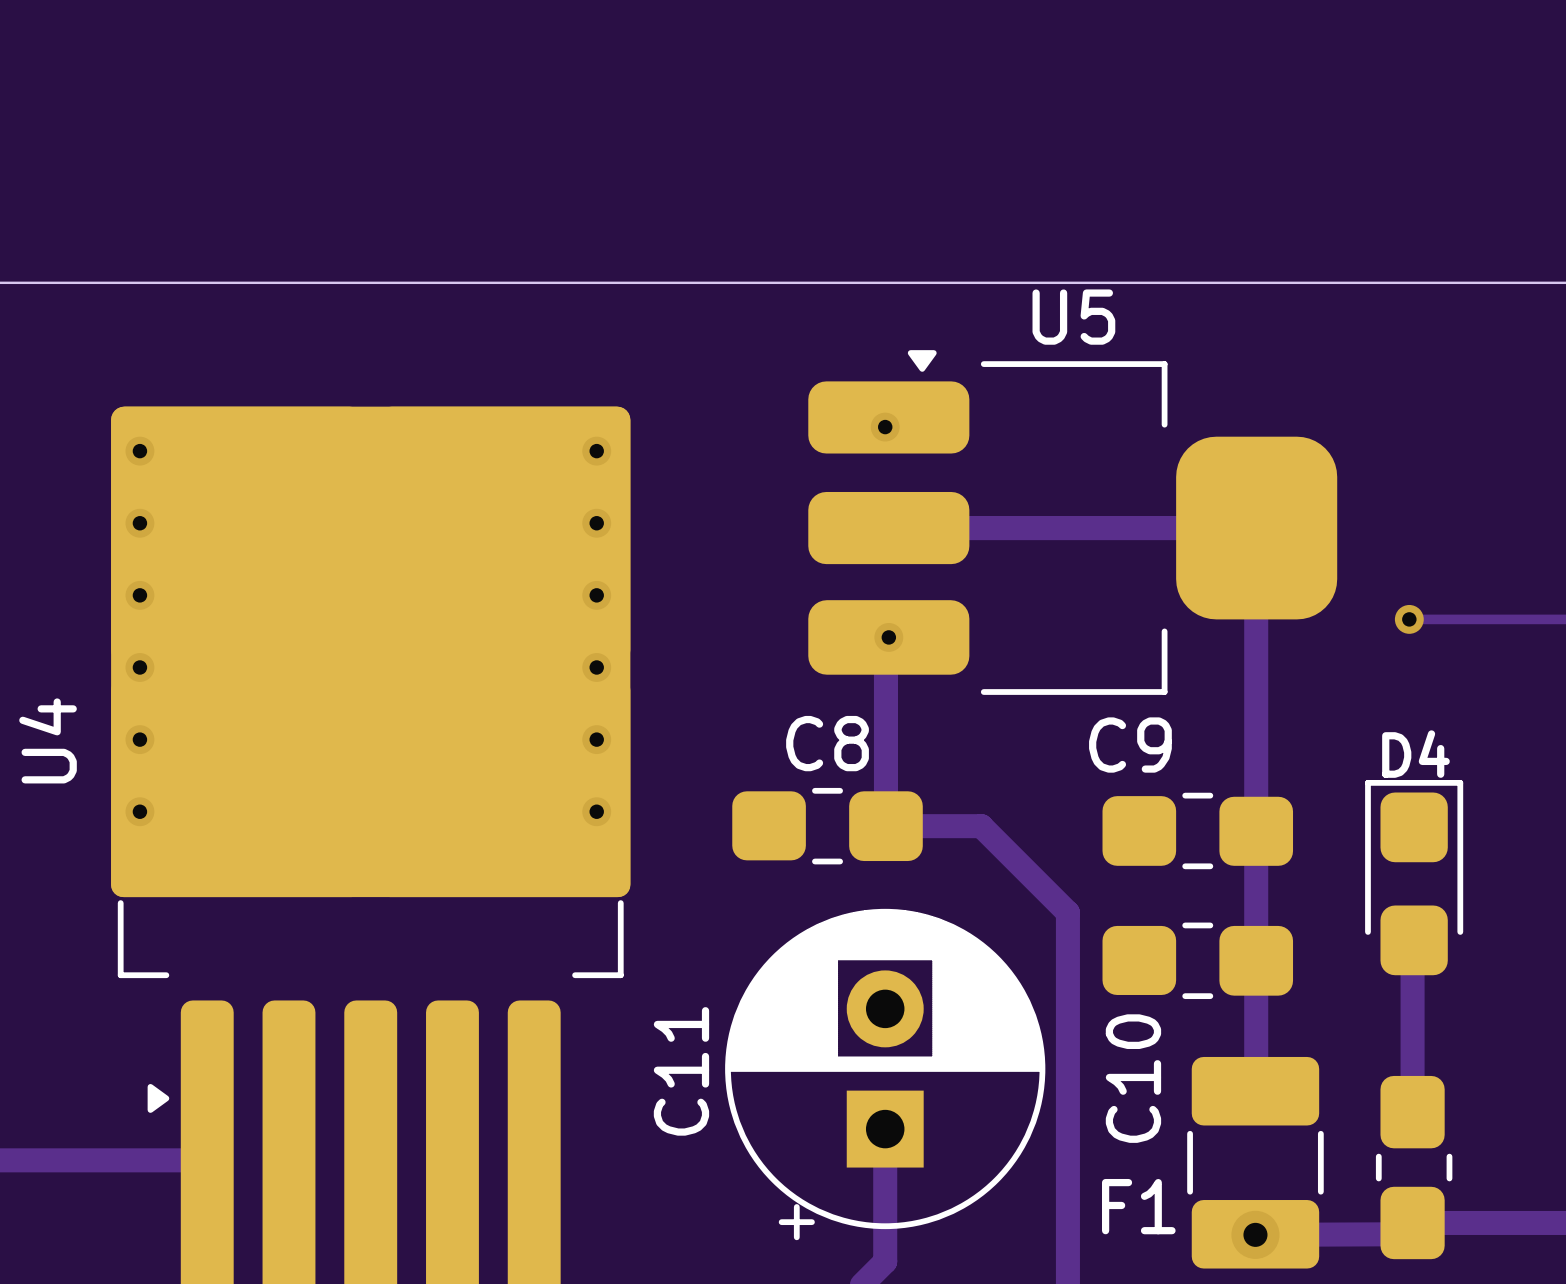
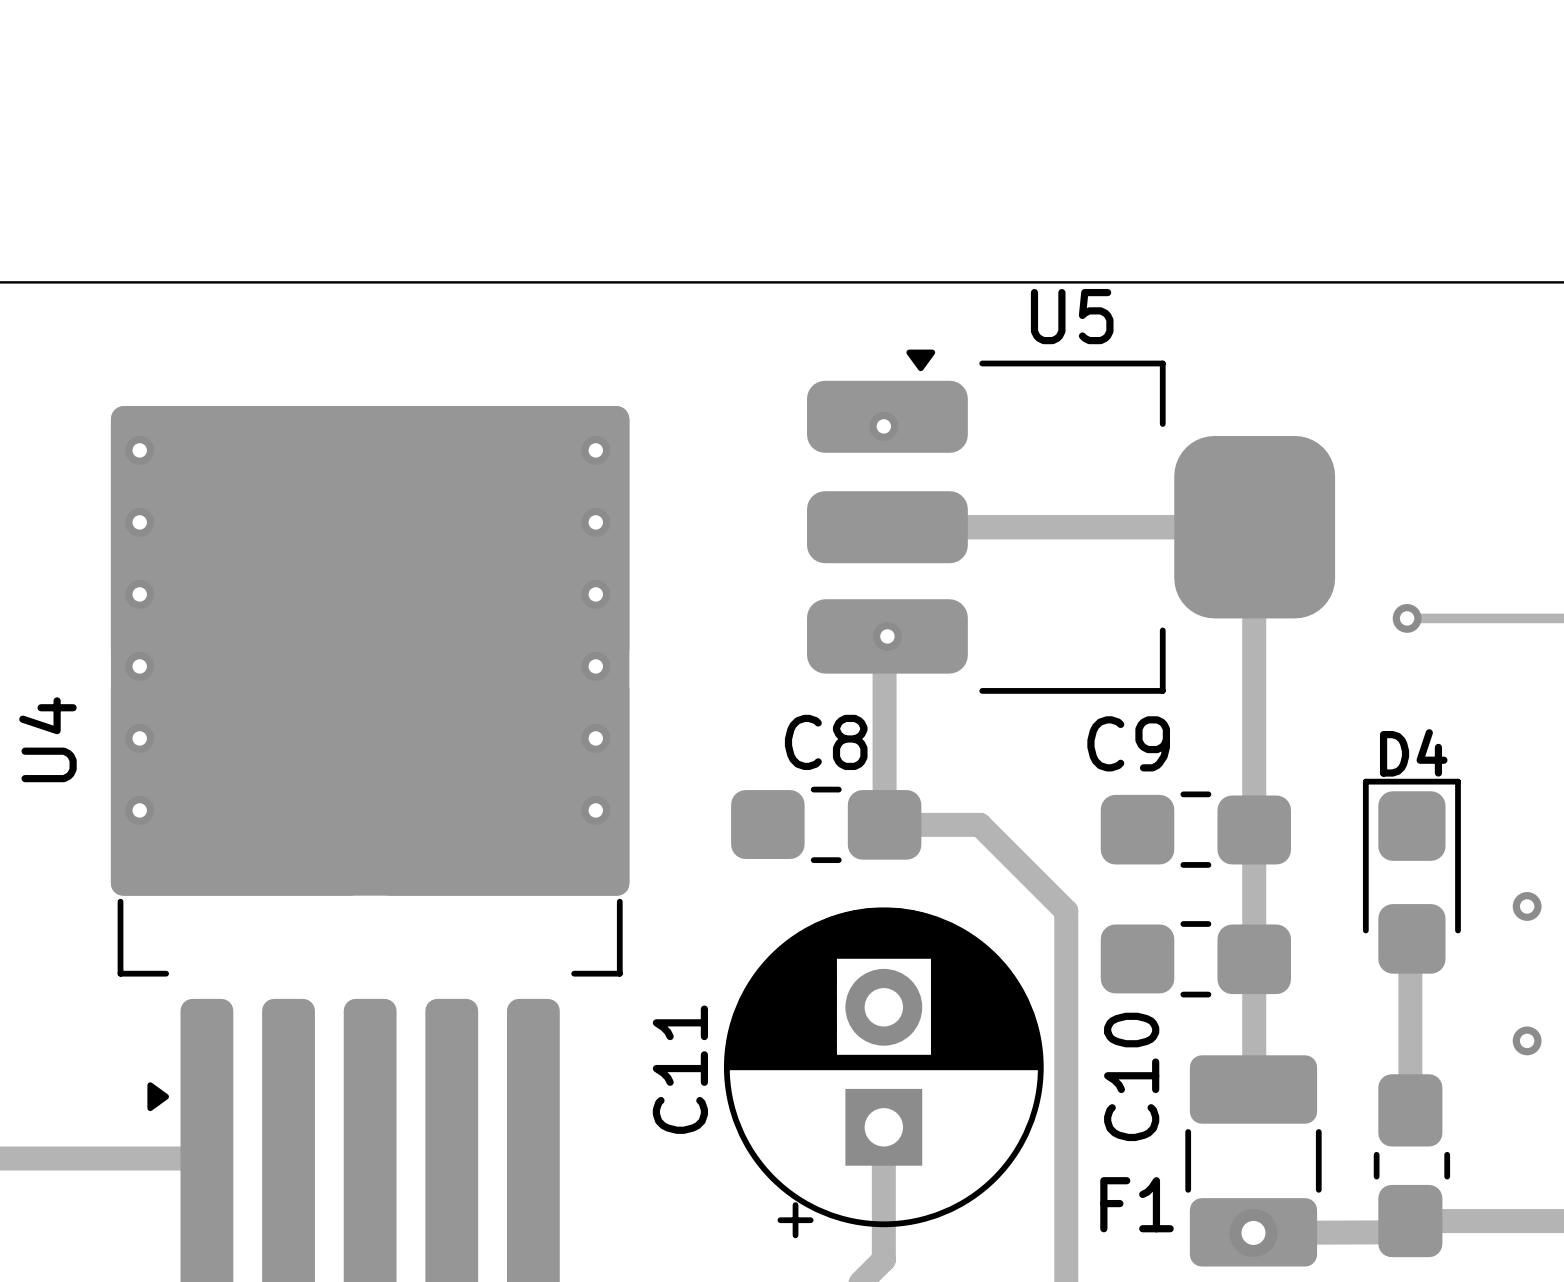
via: none -> (1527, 906)
via: none -> (1527, 1040)

